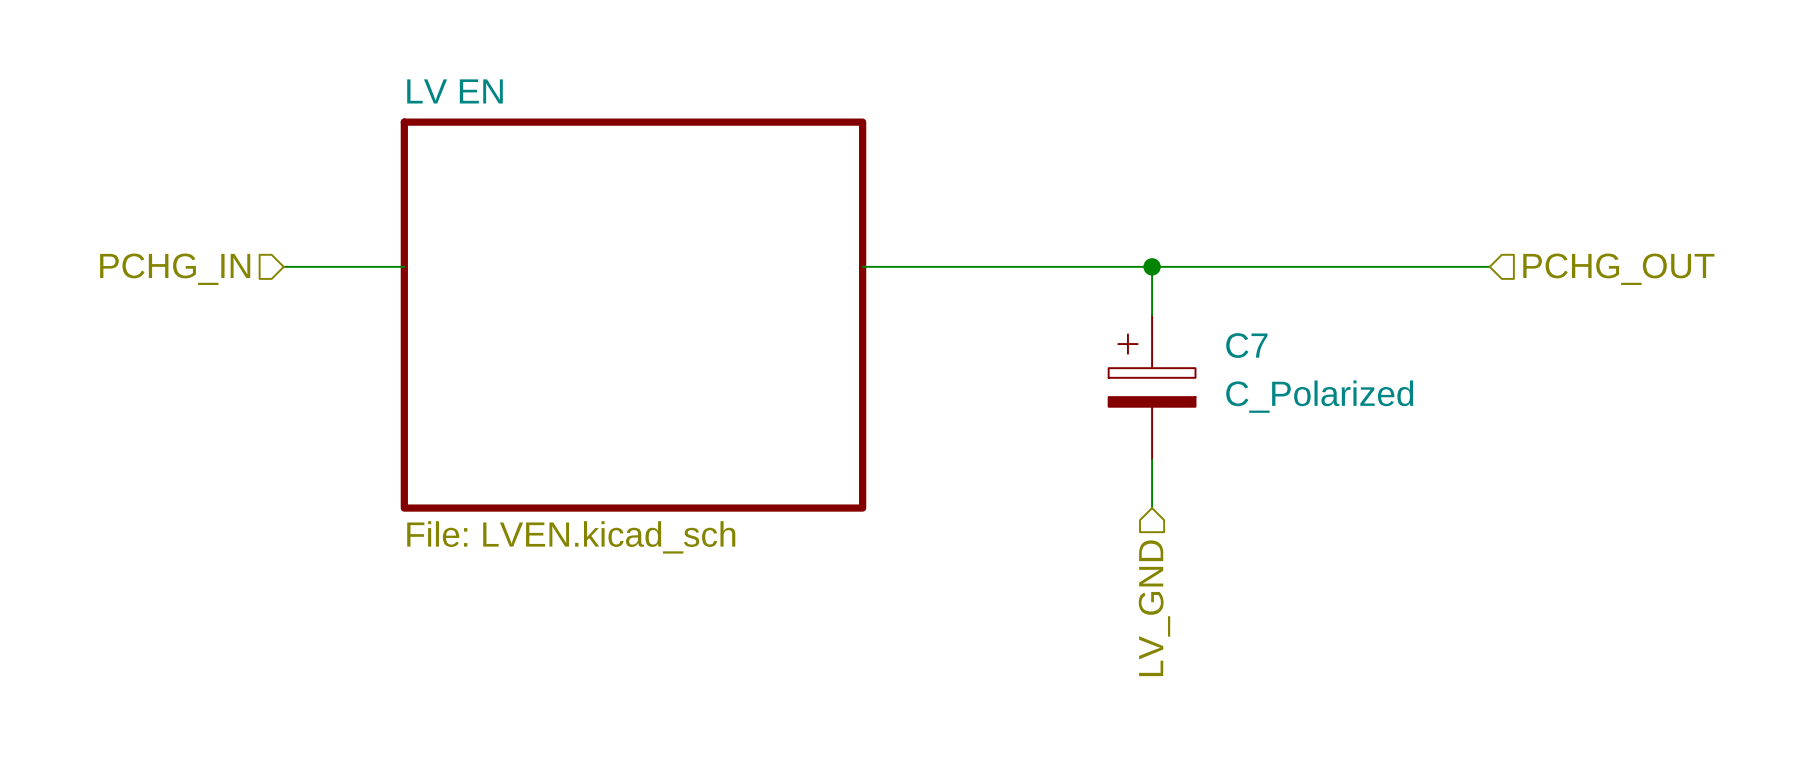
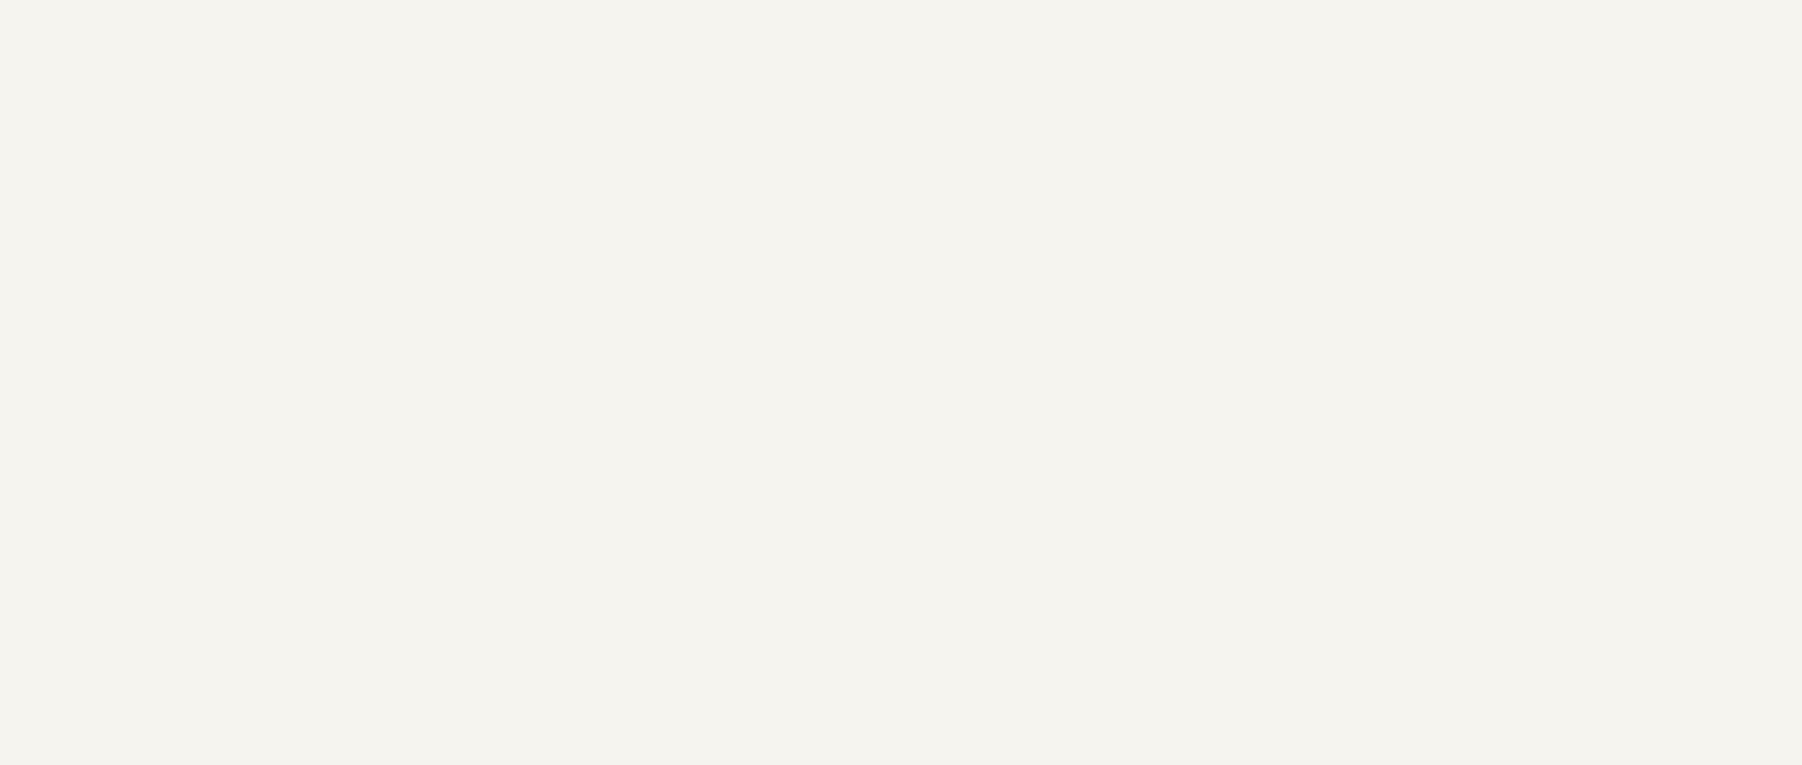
wire: (283, 266) (404, 266) -> none
wire: (862, 266) (1489, 266) -> none
wire: (1152, 266) (1152, 315) -> none
junction: (1152, 266) -> none
hierarchical label: PCHG_IN (175, 269) -> none
hierarchical label: PCHG_OUT (1618, 269) -> none
sheet LV EN: File: LVEN.kicad_sch (633, 315) -> none
C7: C_Polarized (1152, 387) -> none
wire: (1152, 459) (1152, 508) -> none
hierarchical label: LV_GND (1154, 608) -> none

